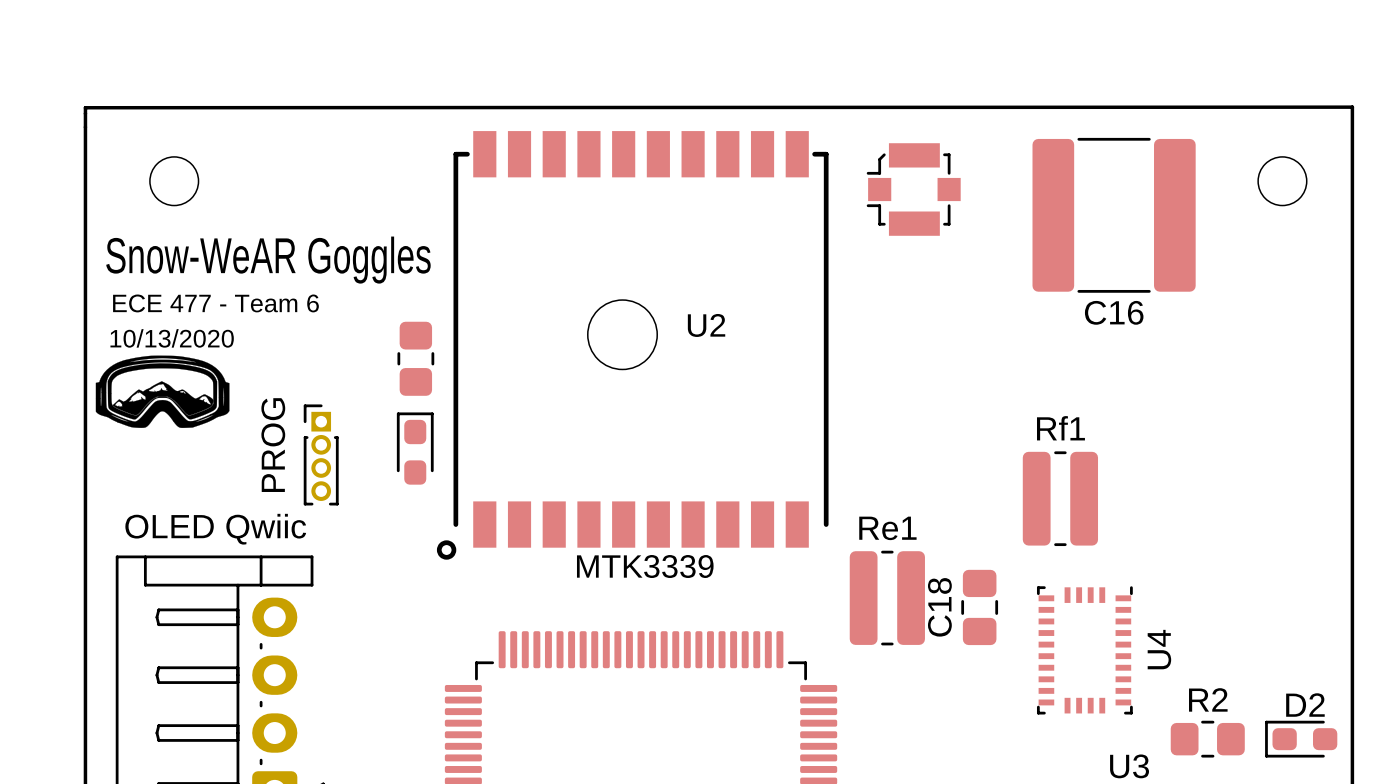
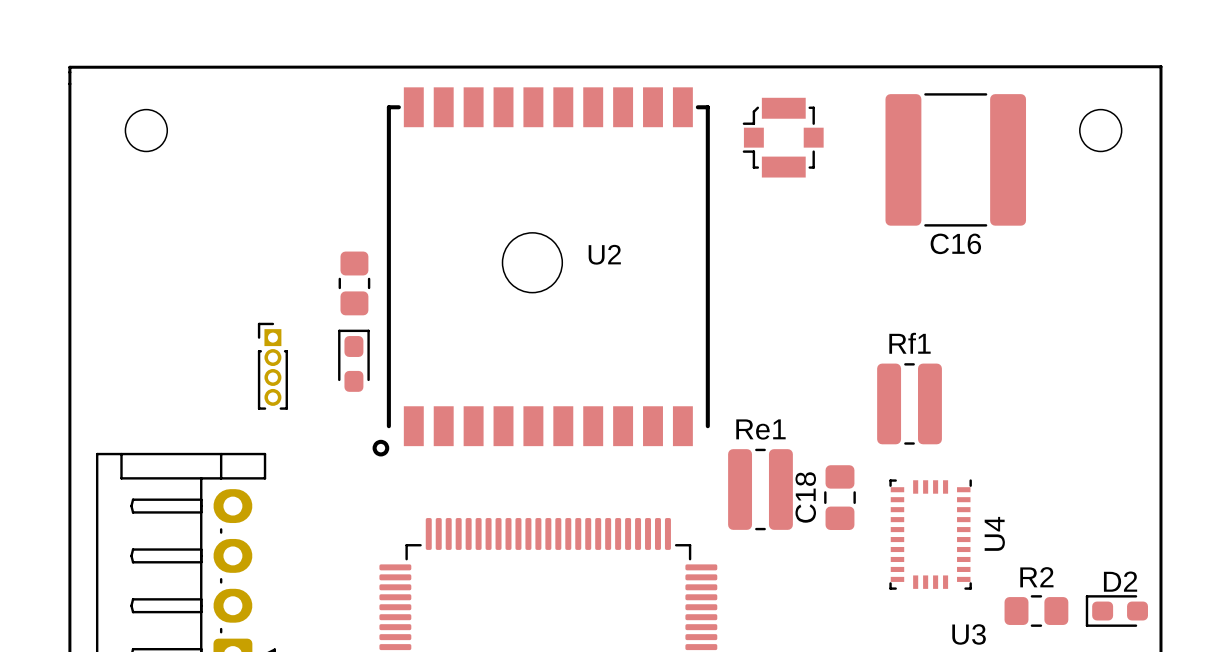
text: Snow-WeAR Goggles (268, 260) -> none
text: ECE 477 - Team 6 (215, 303) -> none
text: 10/13/2020 (172, 338) -> none
drawing: [95, 355, 230, 428] -> none
part value: PROG (273, 445) -> none
part value: OLED Qwiic (215, 529) -> none
U2 value: MTK3339 (645, 566) -> none

